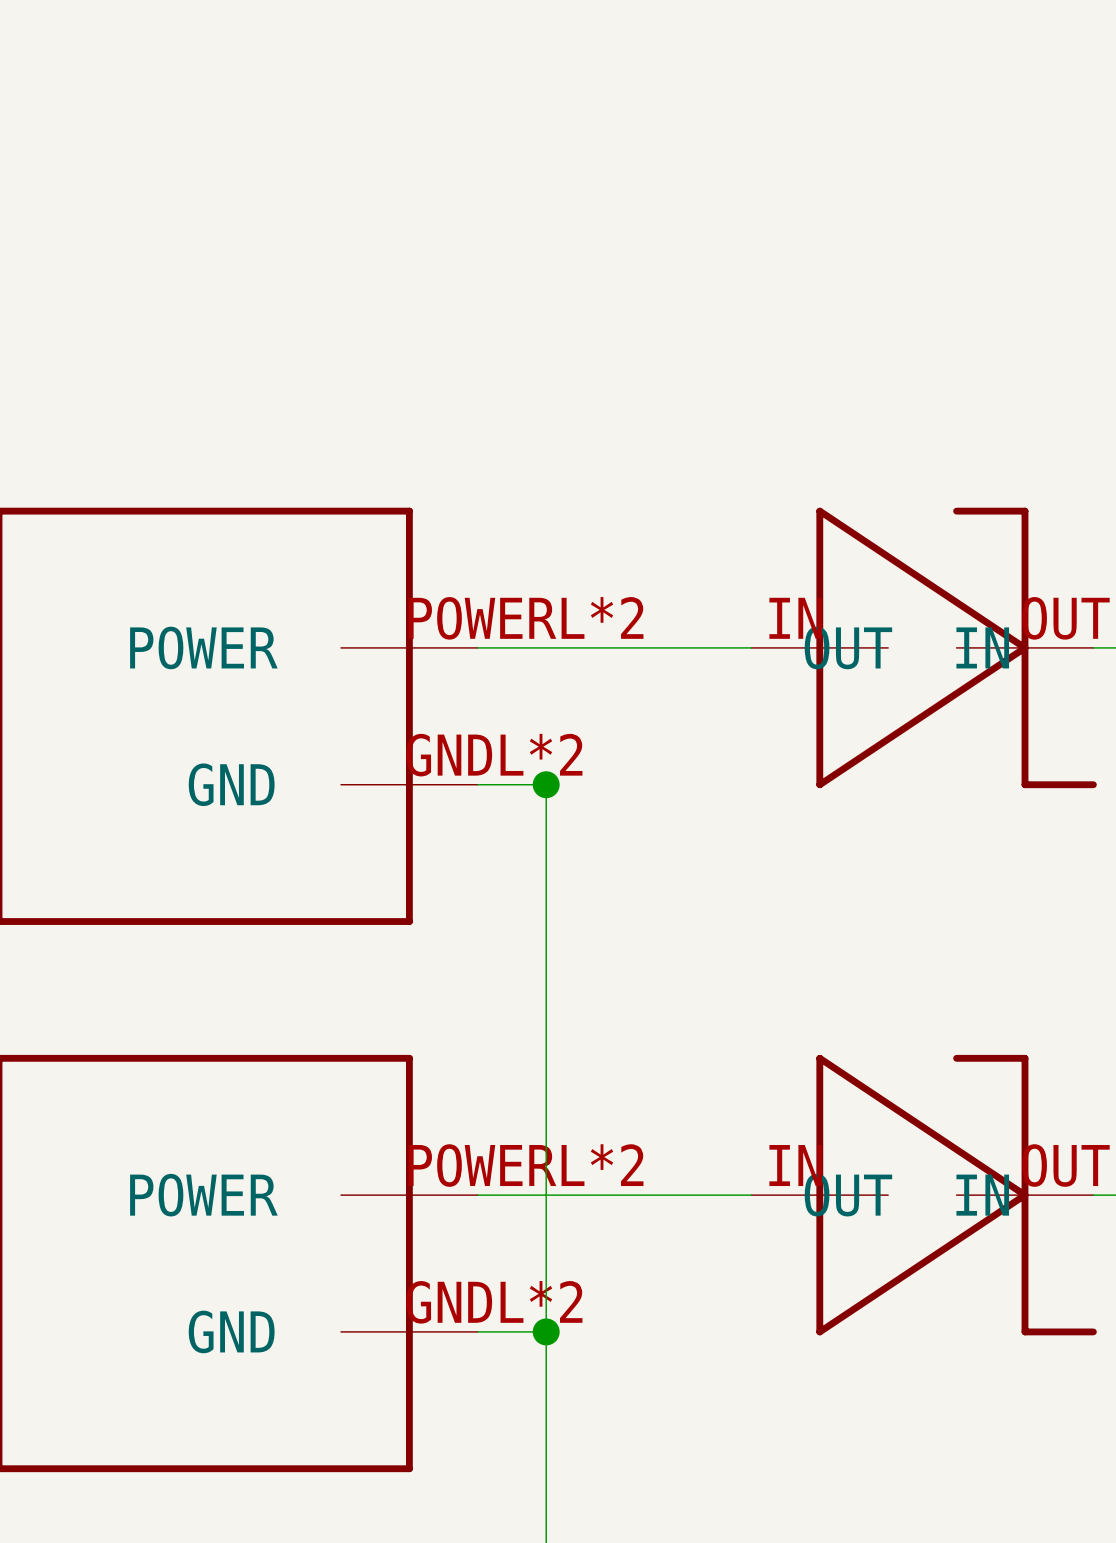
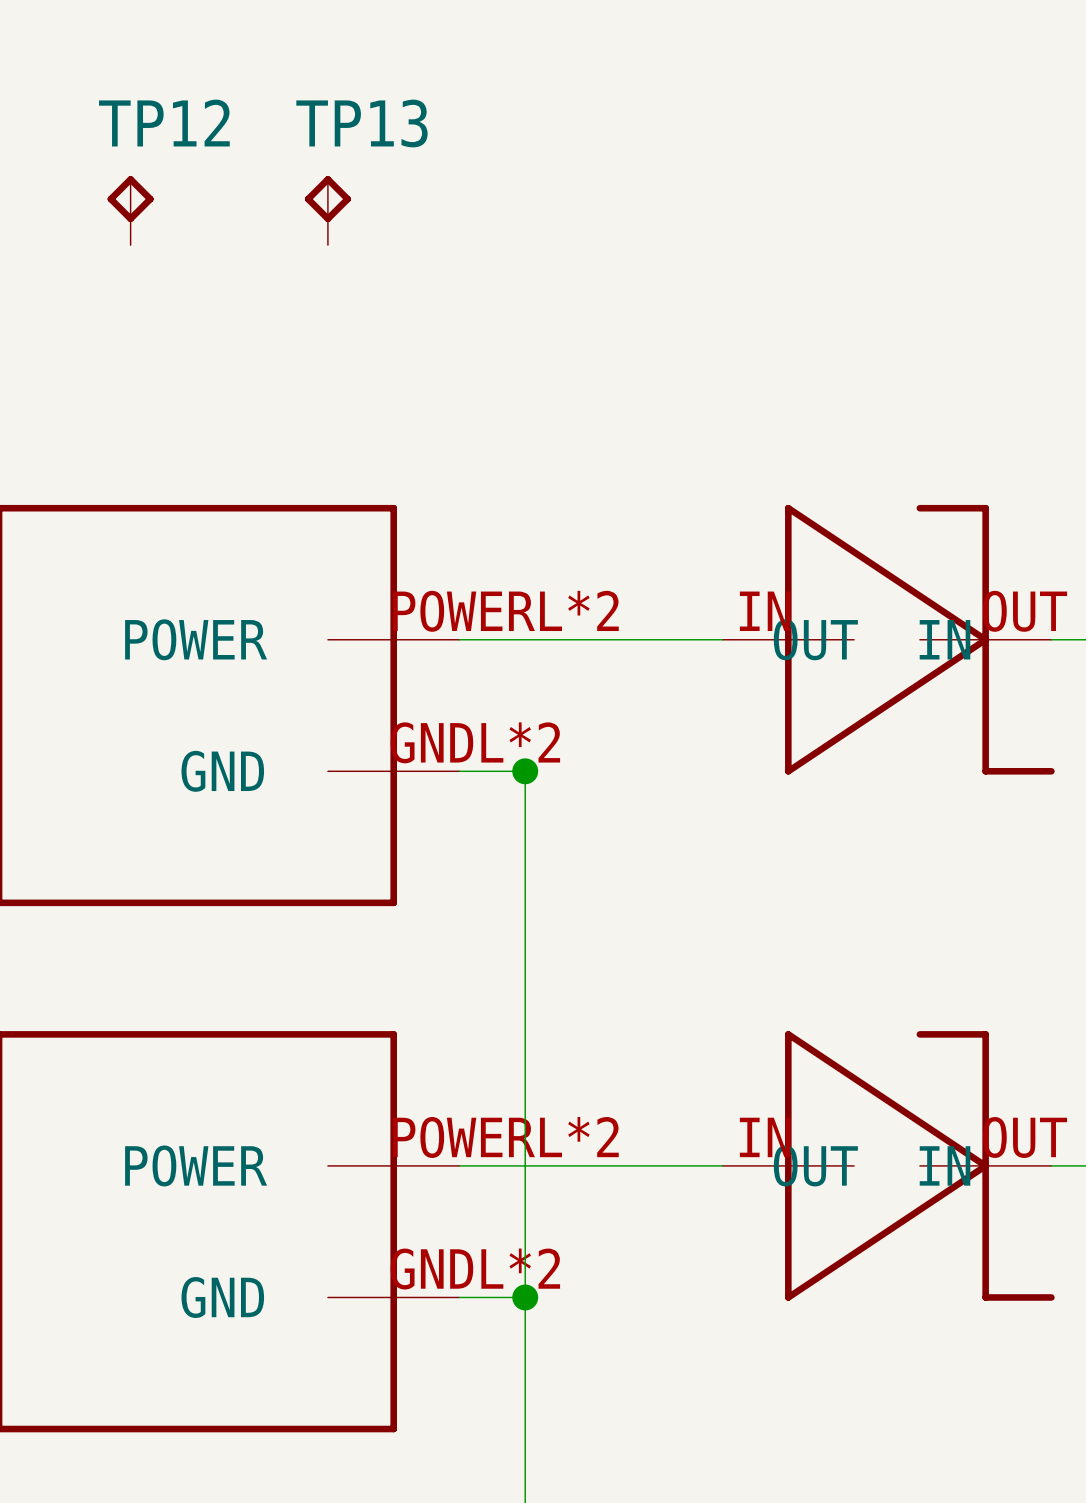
TP12: none -> (130, 210)
TP13: none -> (327, 210)

